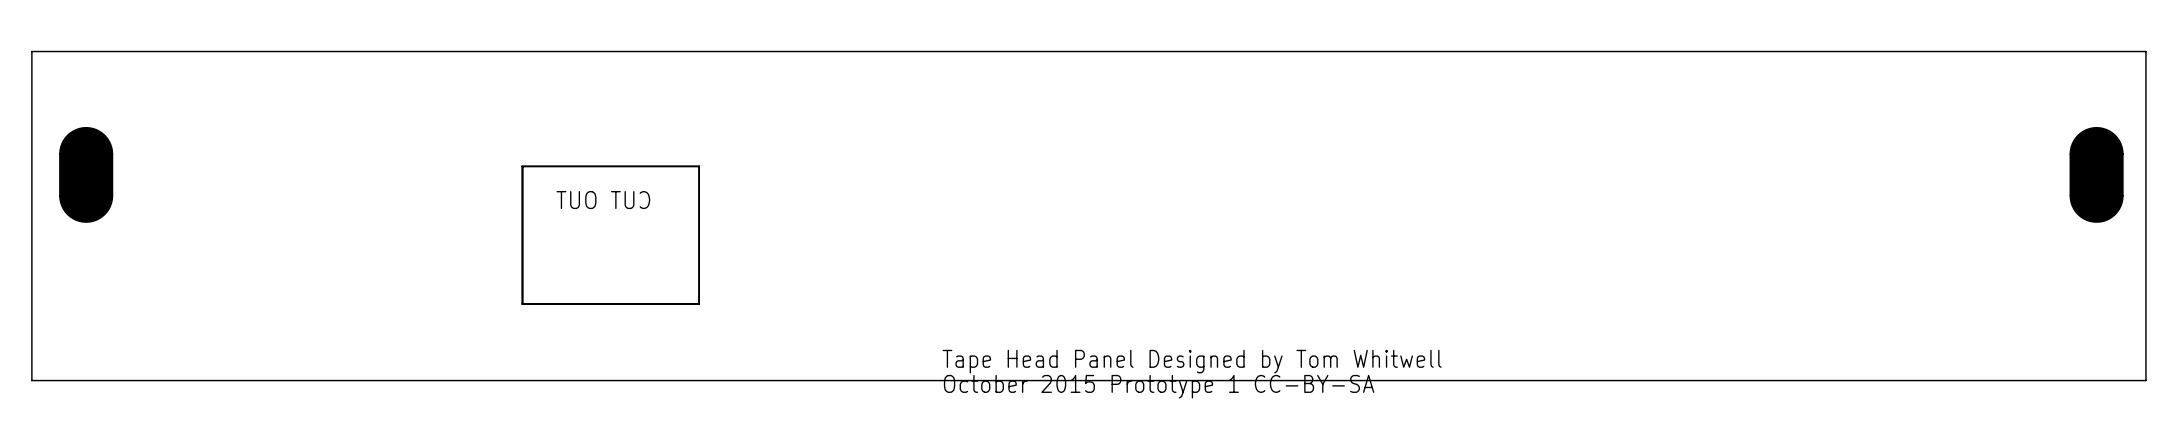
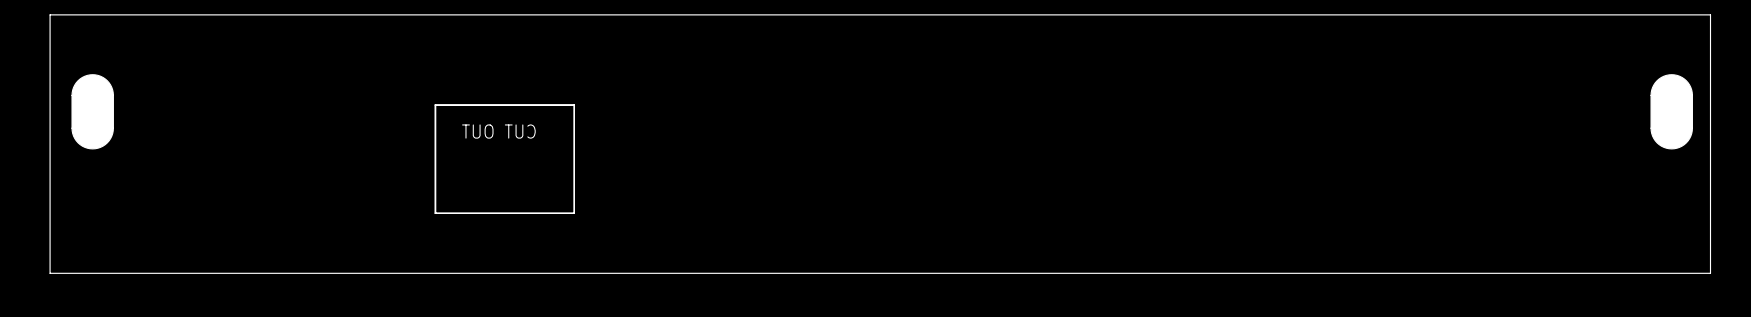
text: Tape Head Panel Designed by Tom Whitwell (1192, 361) -> none
text: October 2015 Prototype 1 CC-BY-SA (1159, 386) -> none

